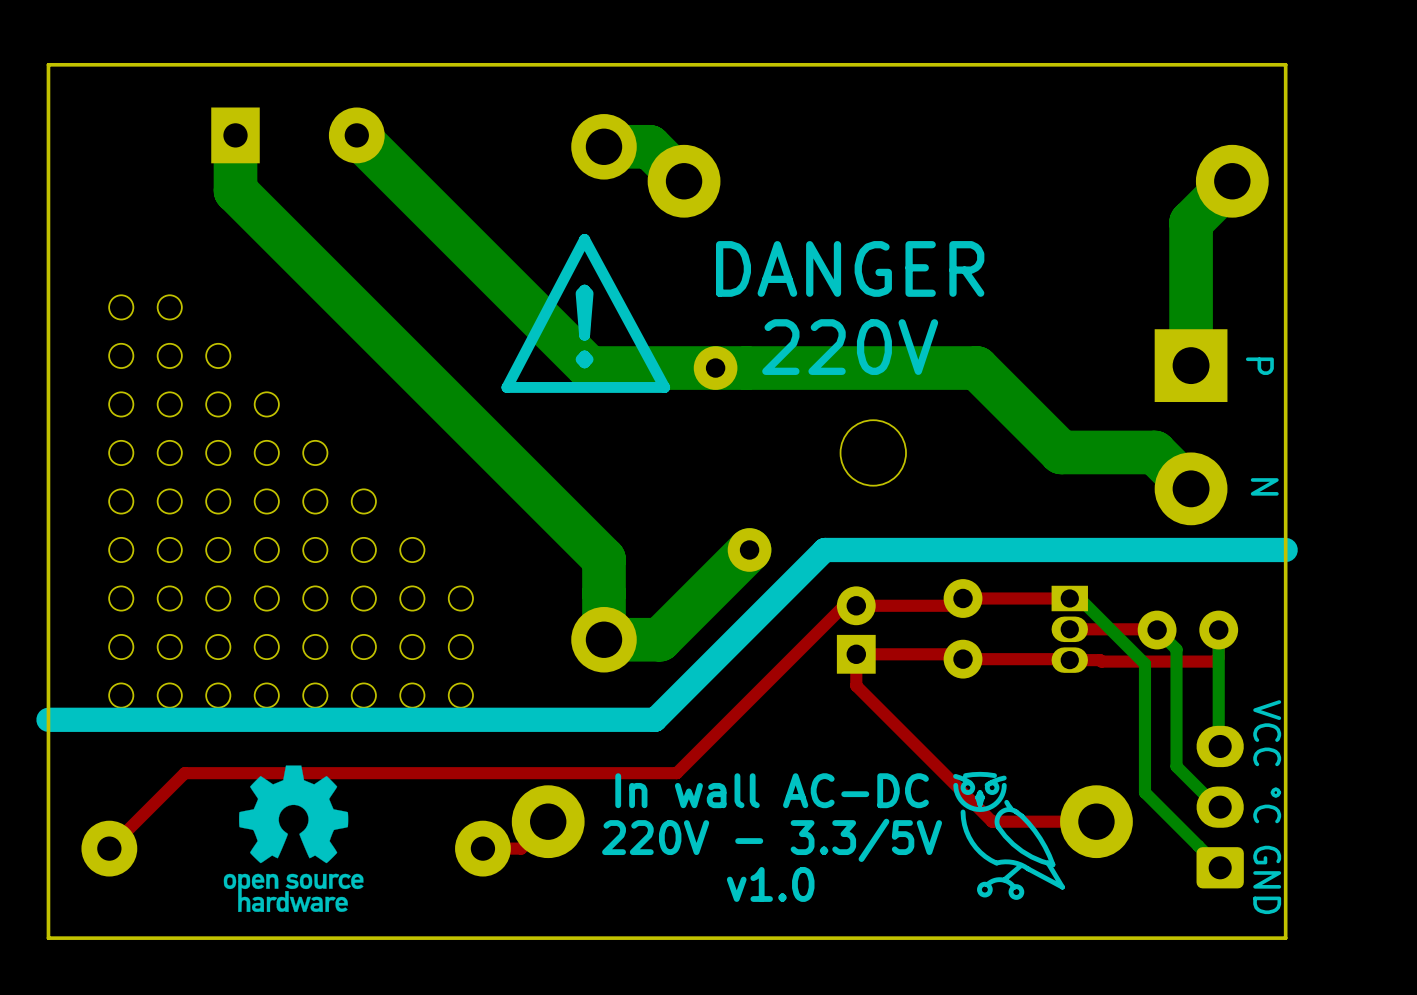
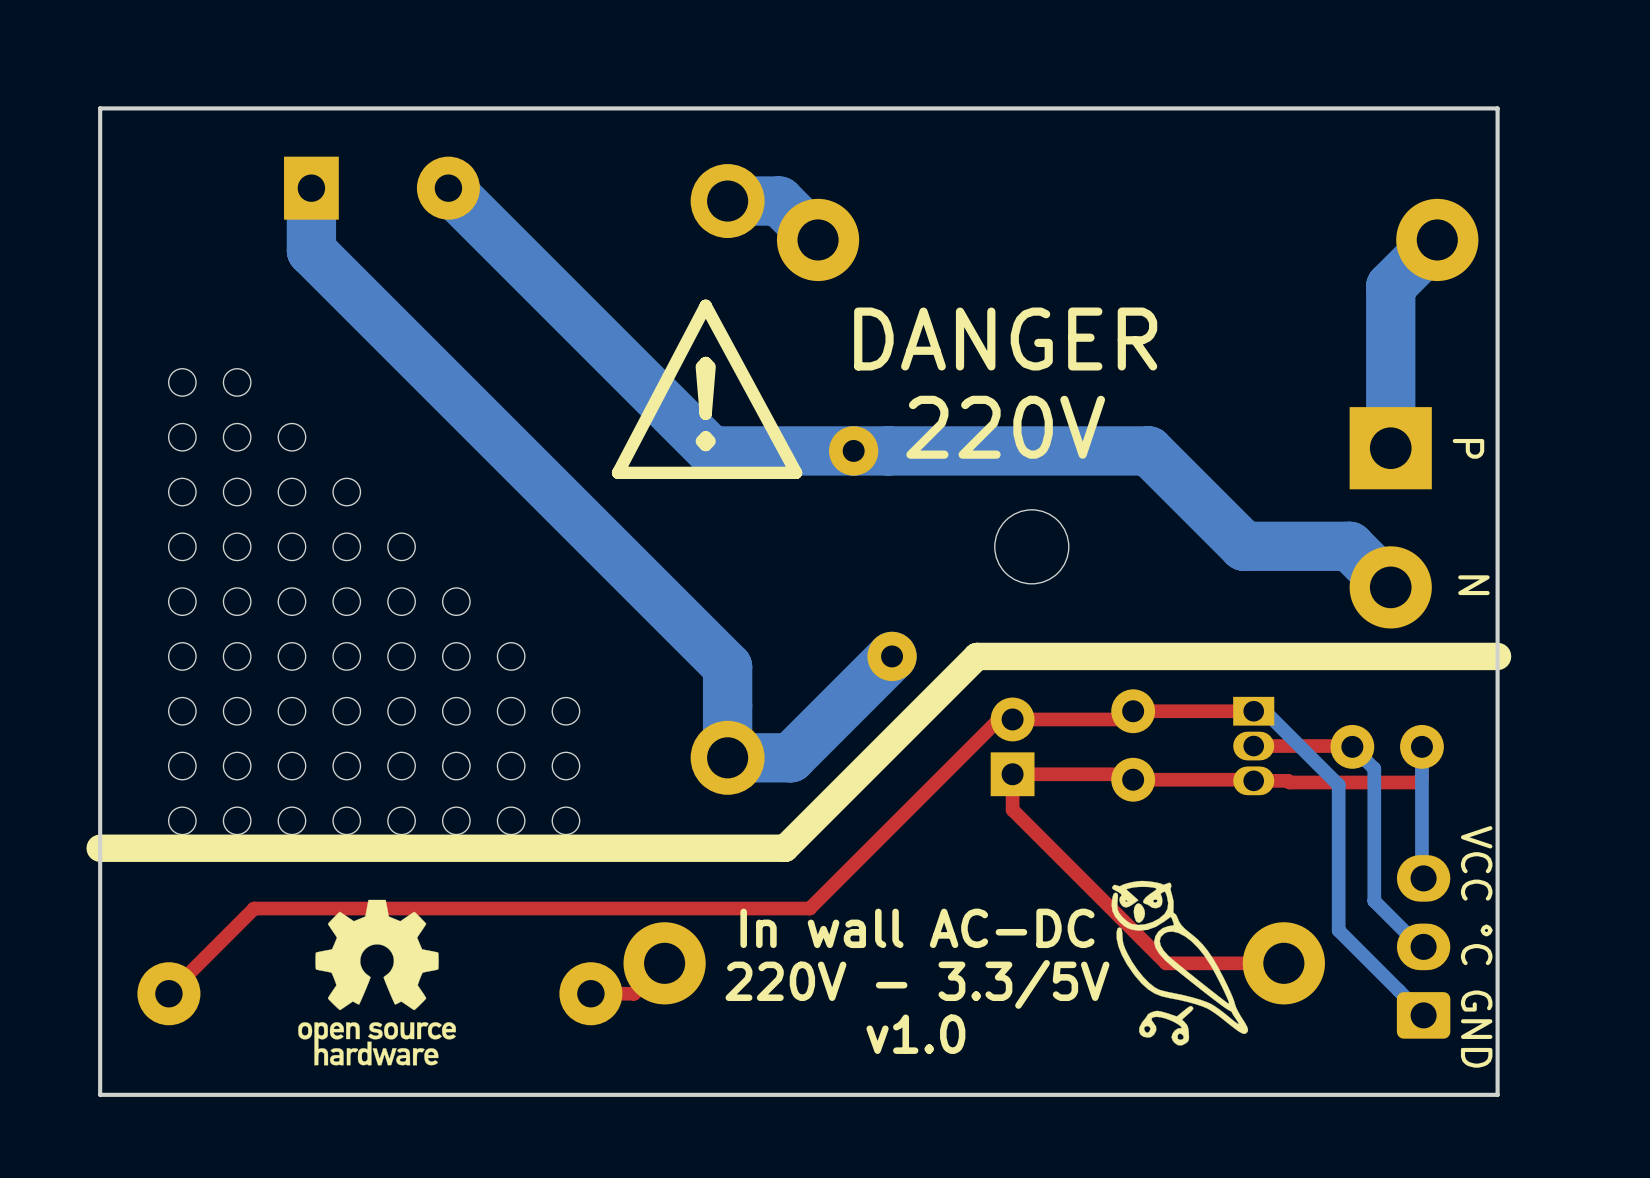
drawing shape: [953, 771, 1065, 900] -> [1111, 880, 1249, 1046]

